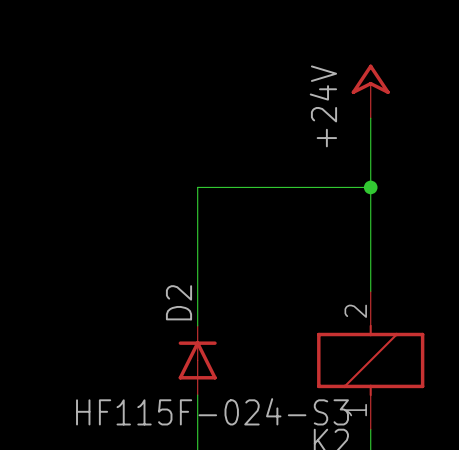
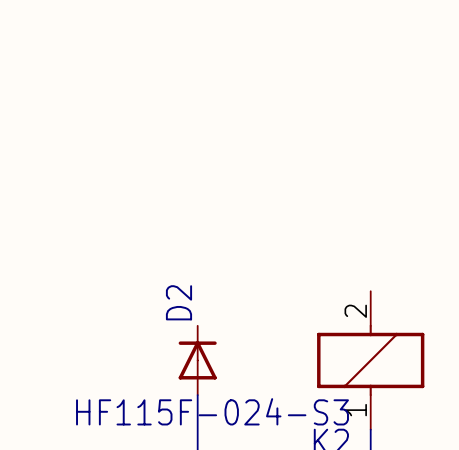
power symbol: +24V (370, 91) -> none
wire: (370, 118) (370, 291) -> none
wire: (370, 187) (197, 187) (197, 325) -> none
junction: (370, 187) -> none

